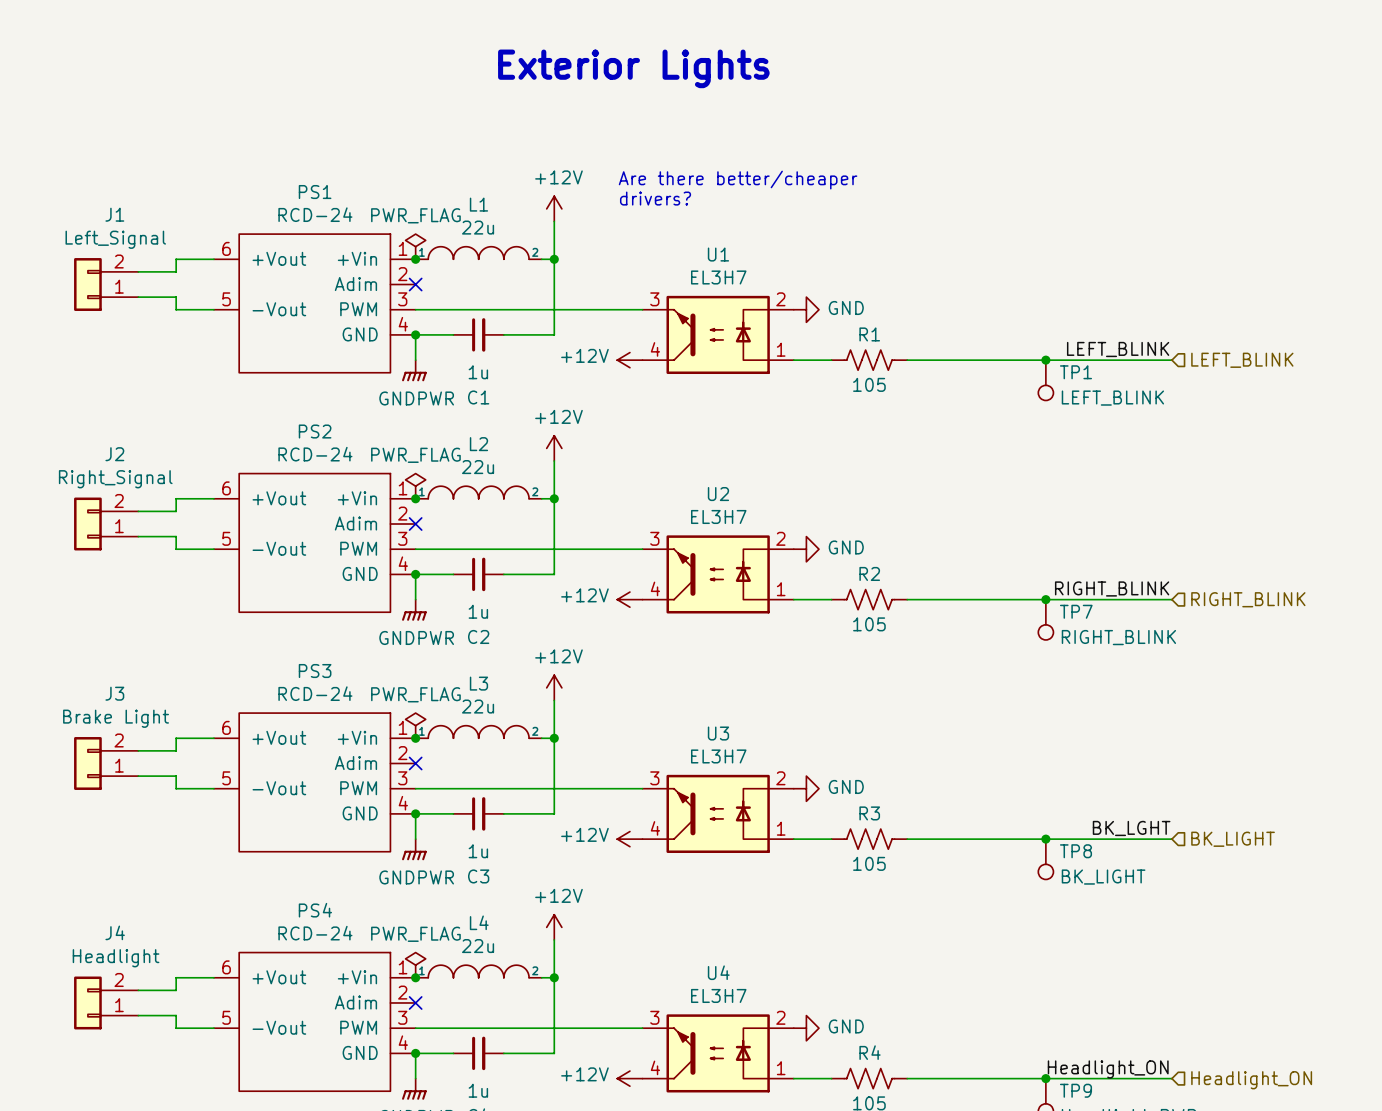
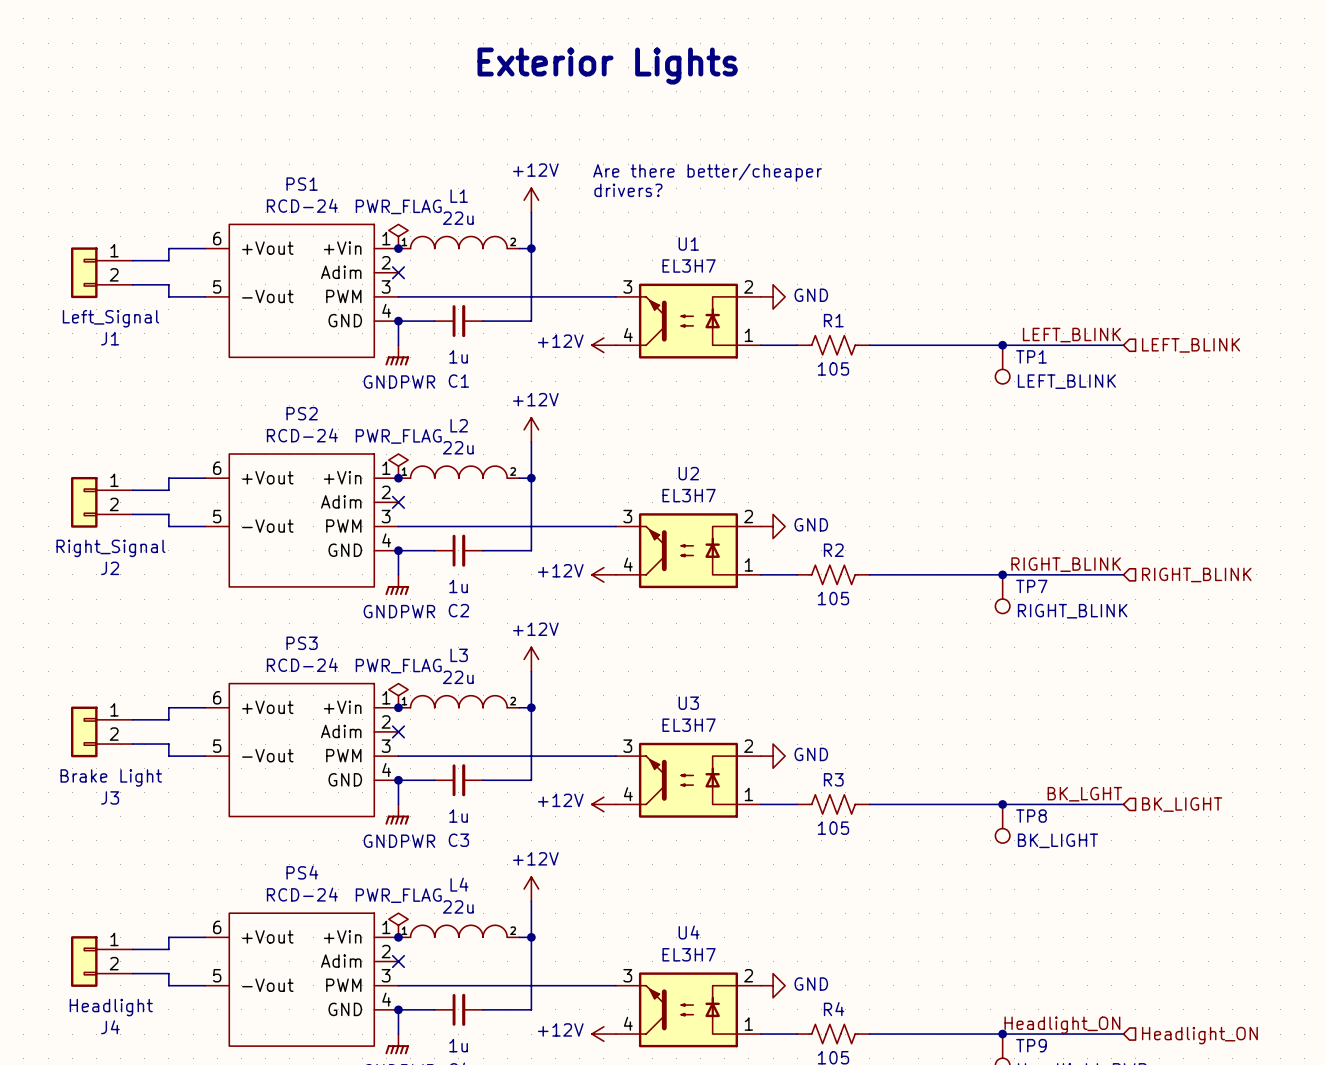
J1 flip: as is (87, 284) -> up-down (84, 272)
J2 flip: as is (87, 524) -> up-down (84, 502)
J3 flip: as is (87, 763) -> up-down (84, 731)
J4 flip: as is (87, 1002) -> up-down (84, 961)

